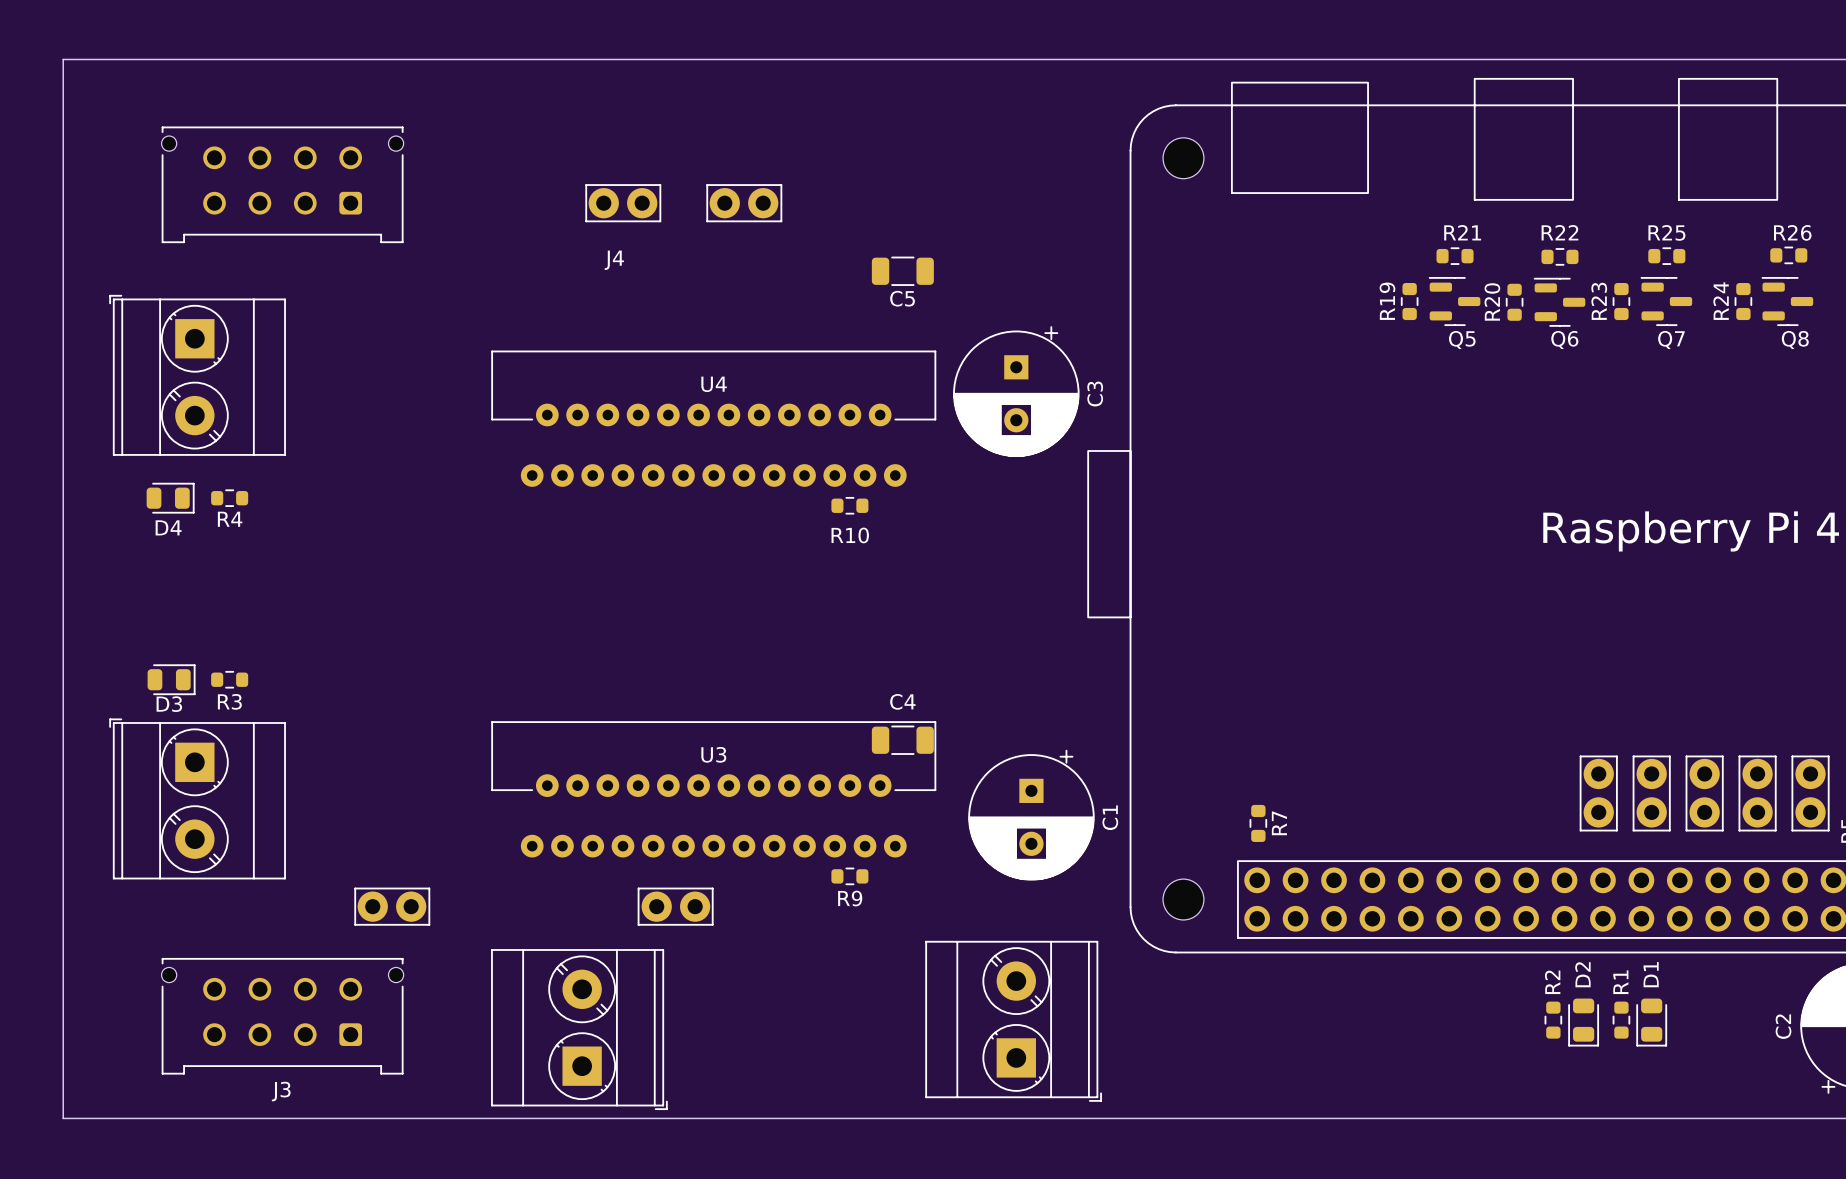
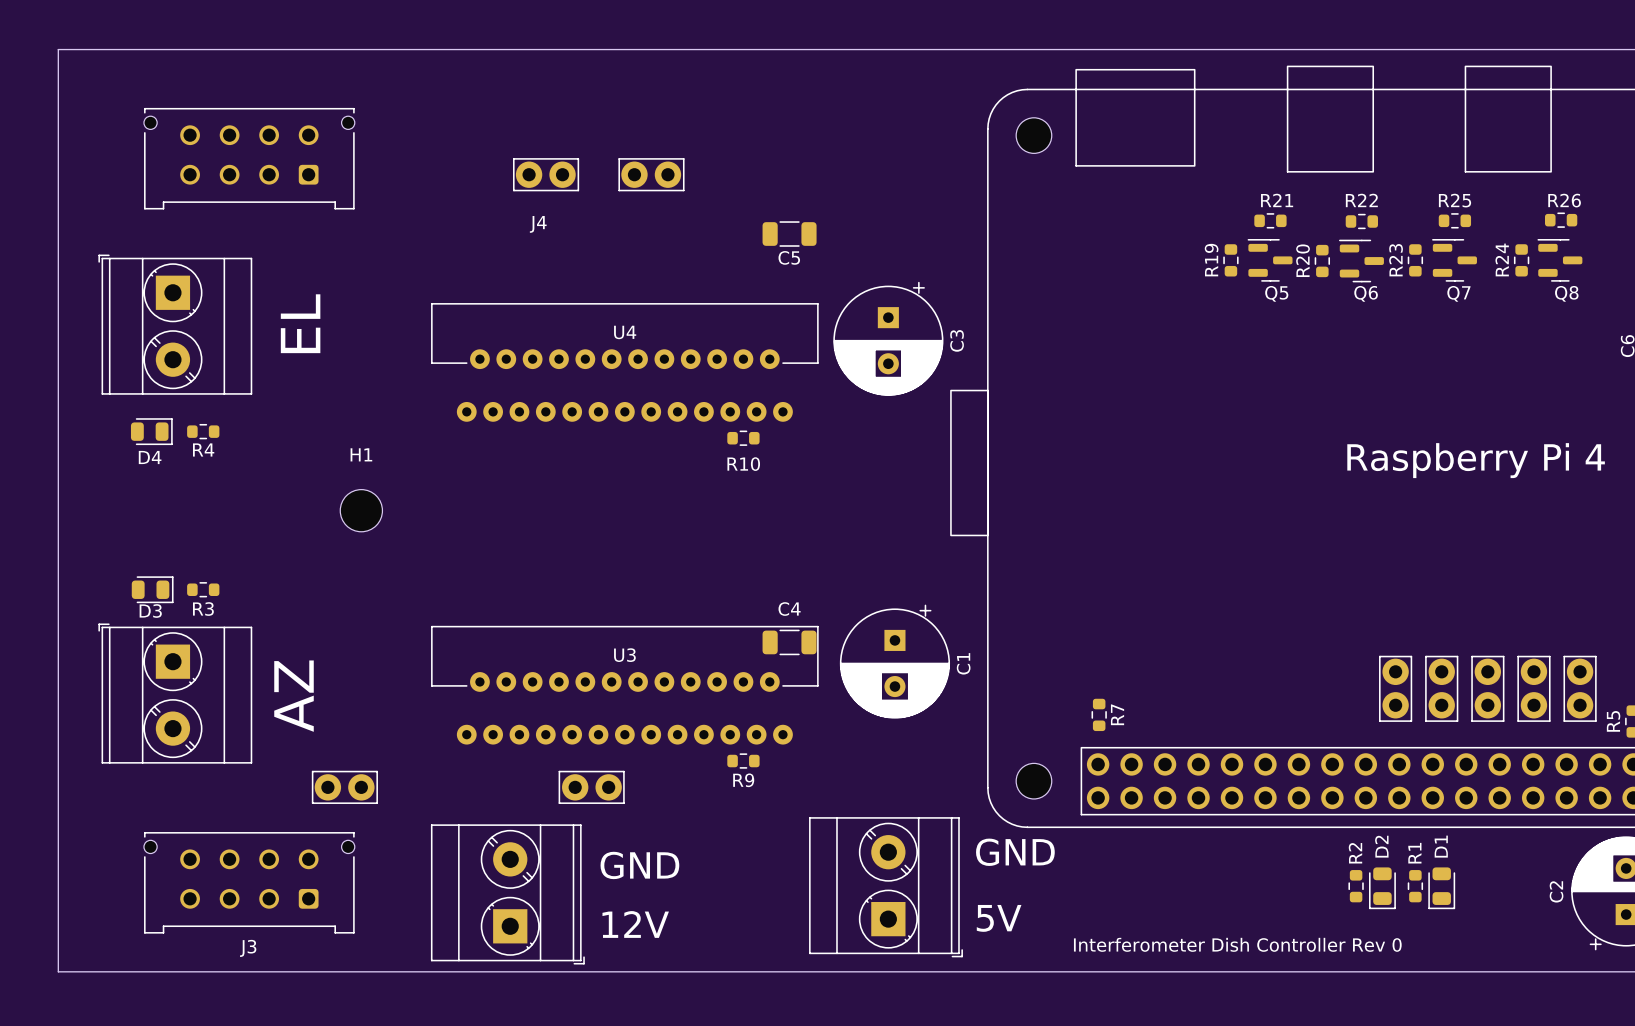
text: none -> EL (300, 323)
H1: none -> (361, 510)
text: none -> AZ (294, 696)
C1 position: (1031, 815) -> (894, 661)
text: none -> GND (1015, 852)
text: none -> GND (639, 865)
text: none -> 5V (999, 918)
text: none -> 12V (635, 924)
text: none -> Interferometer Dish Controller Rev 0 (1237, 944)

